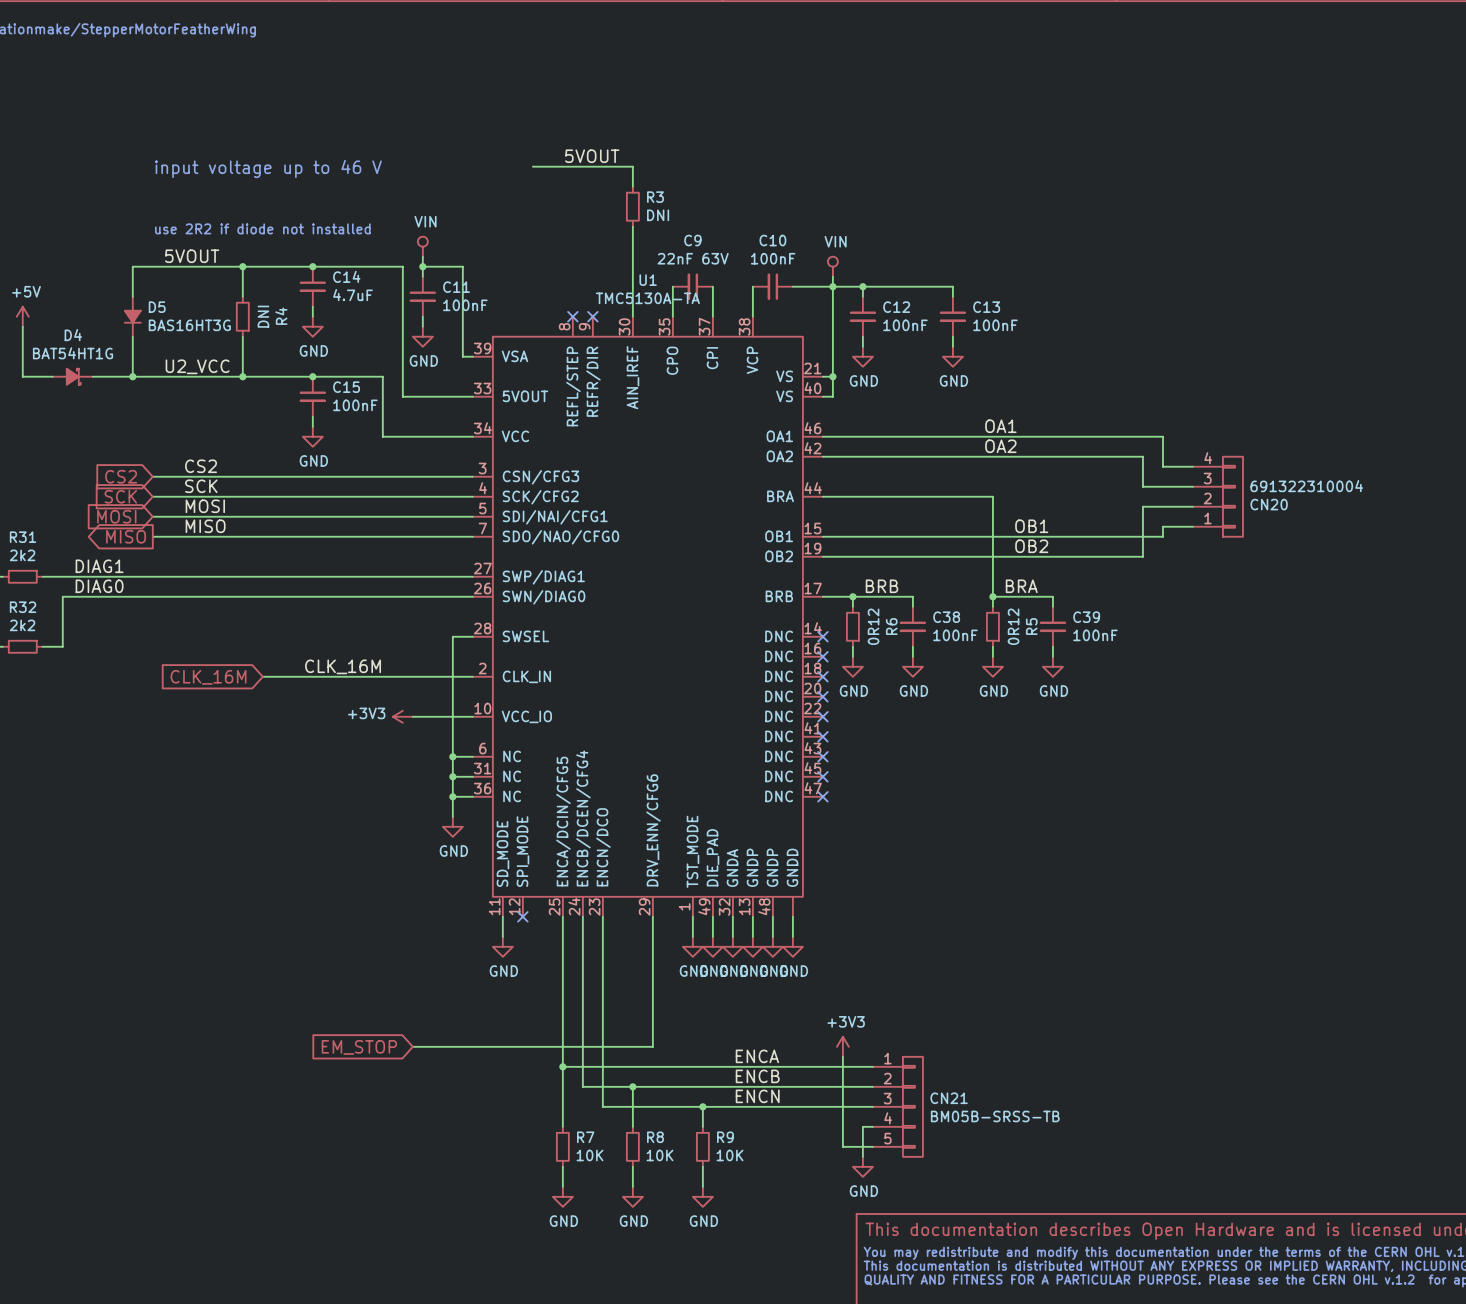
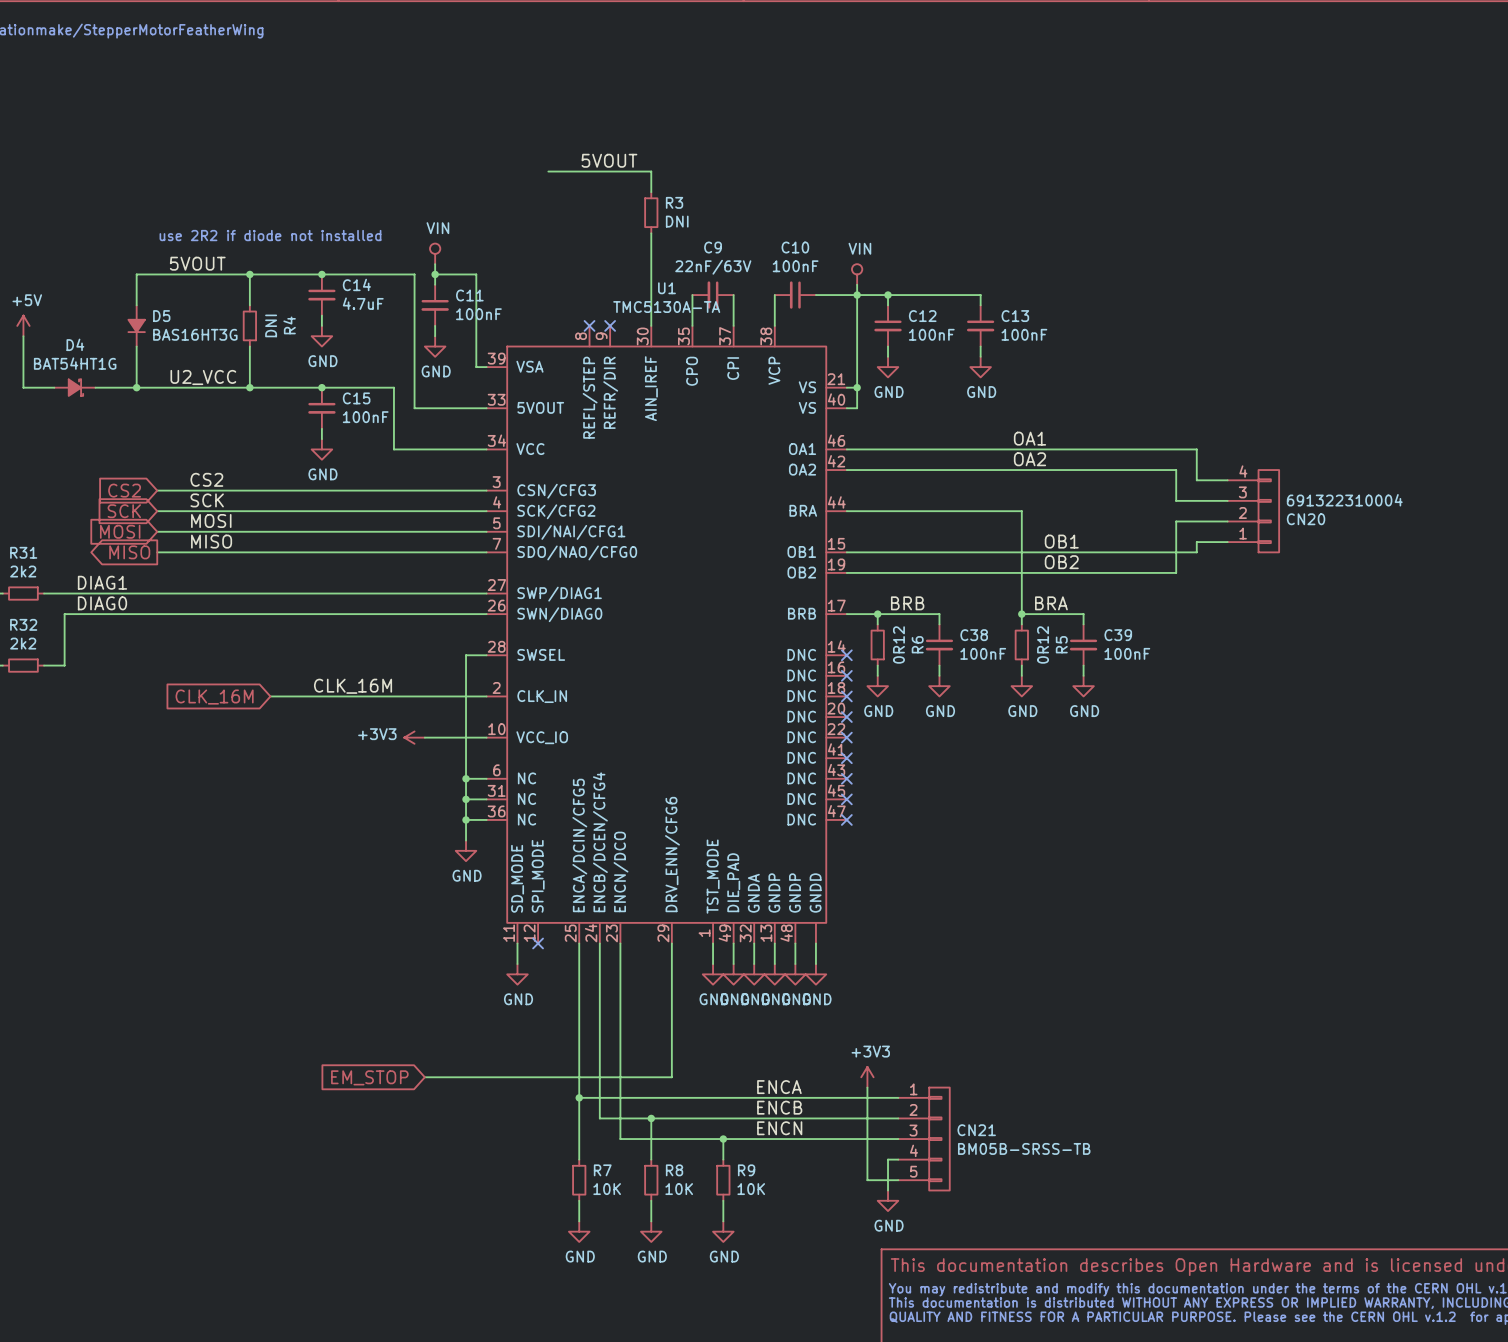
text: input voltage up to 46 V (268, 168) -> none
C9 value: 22nF 63V (693, 258) -> 22nF/63V (713, 267)

